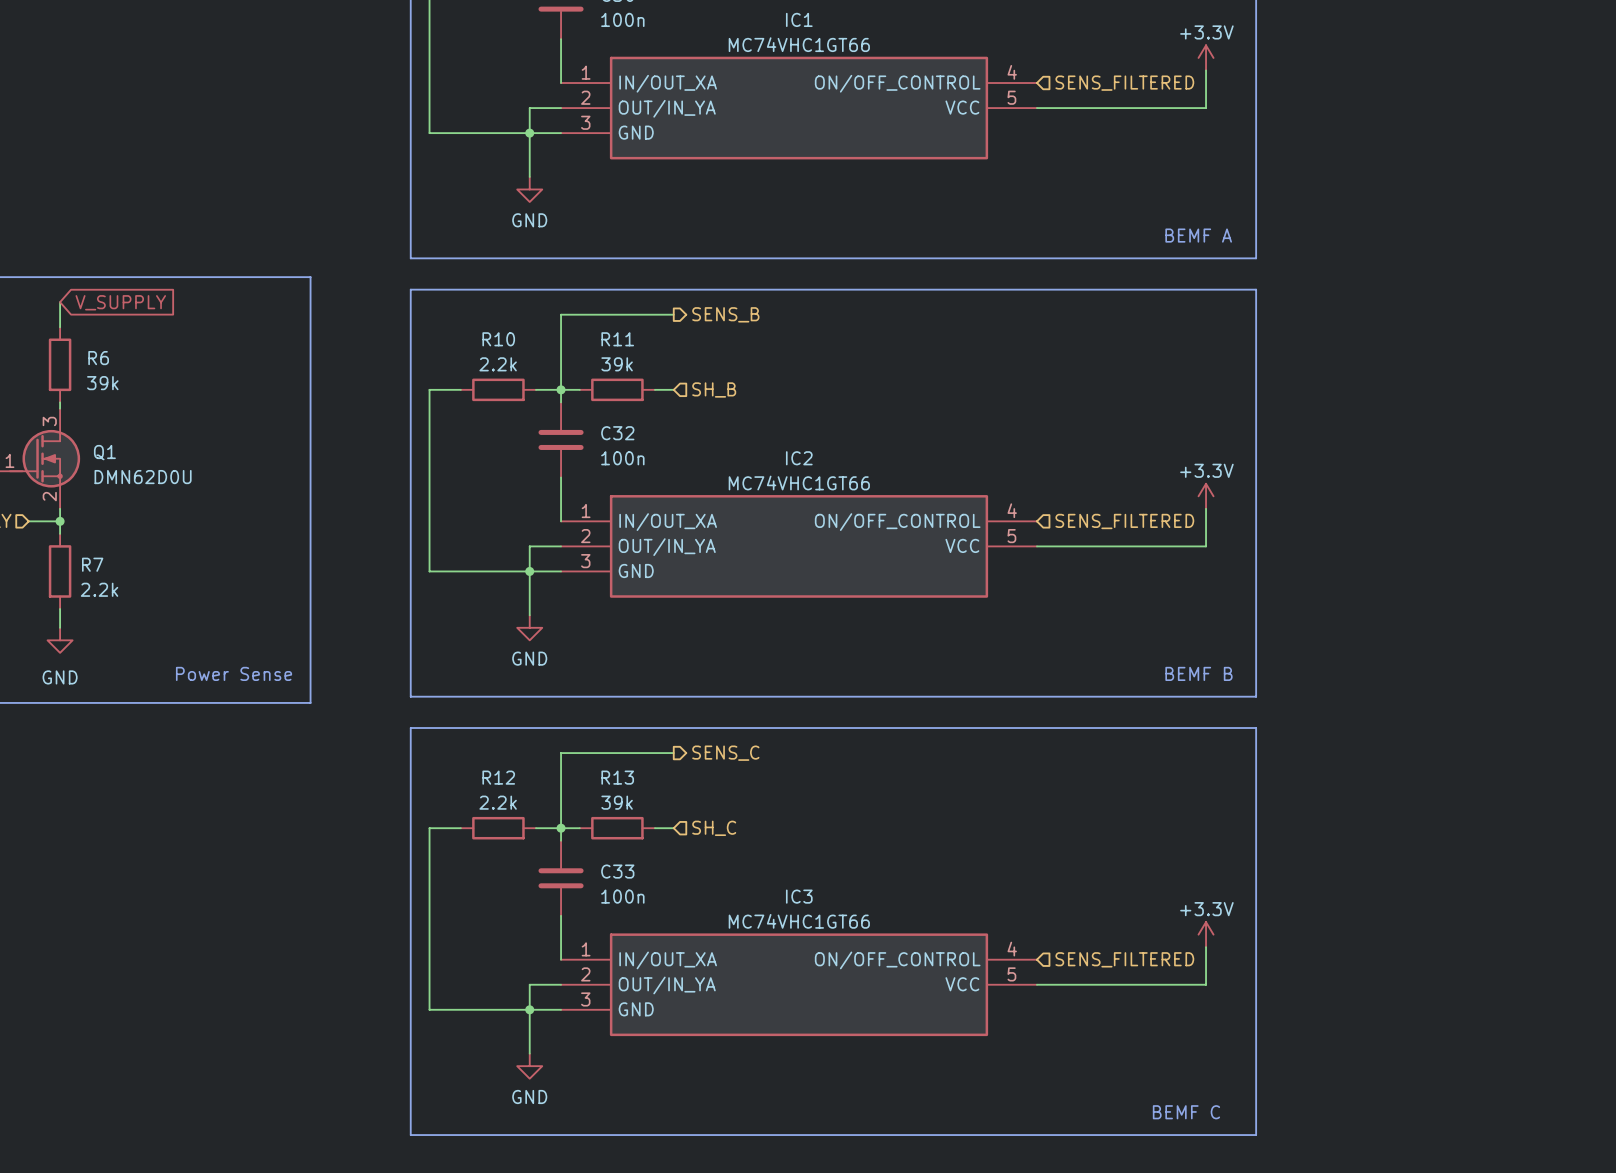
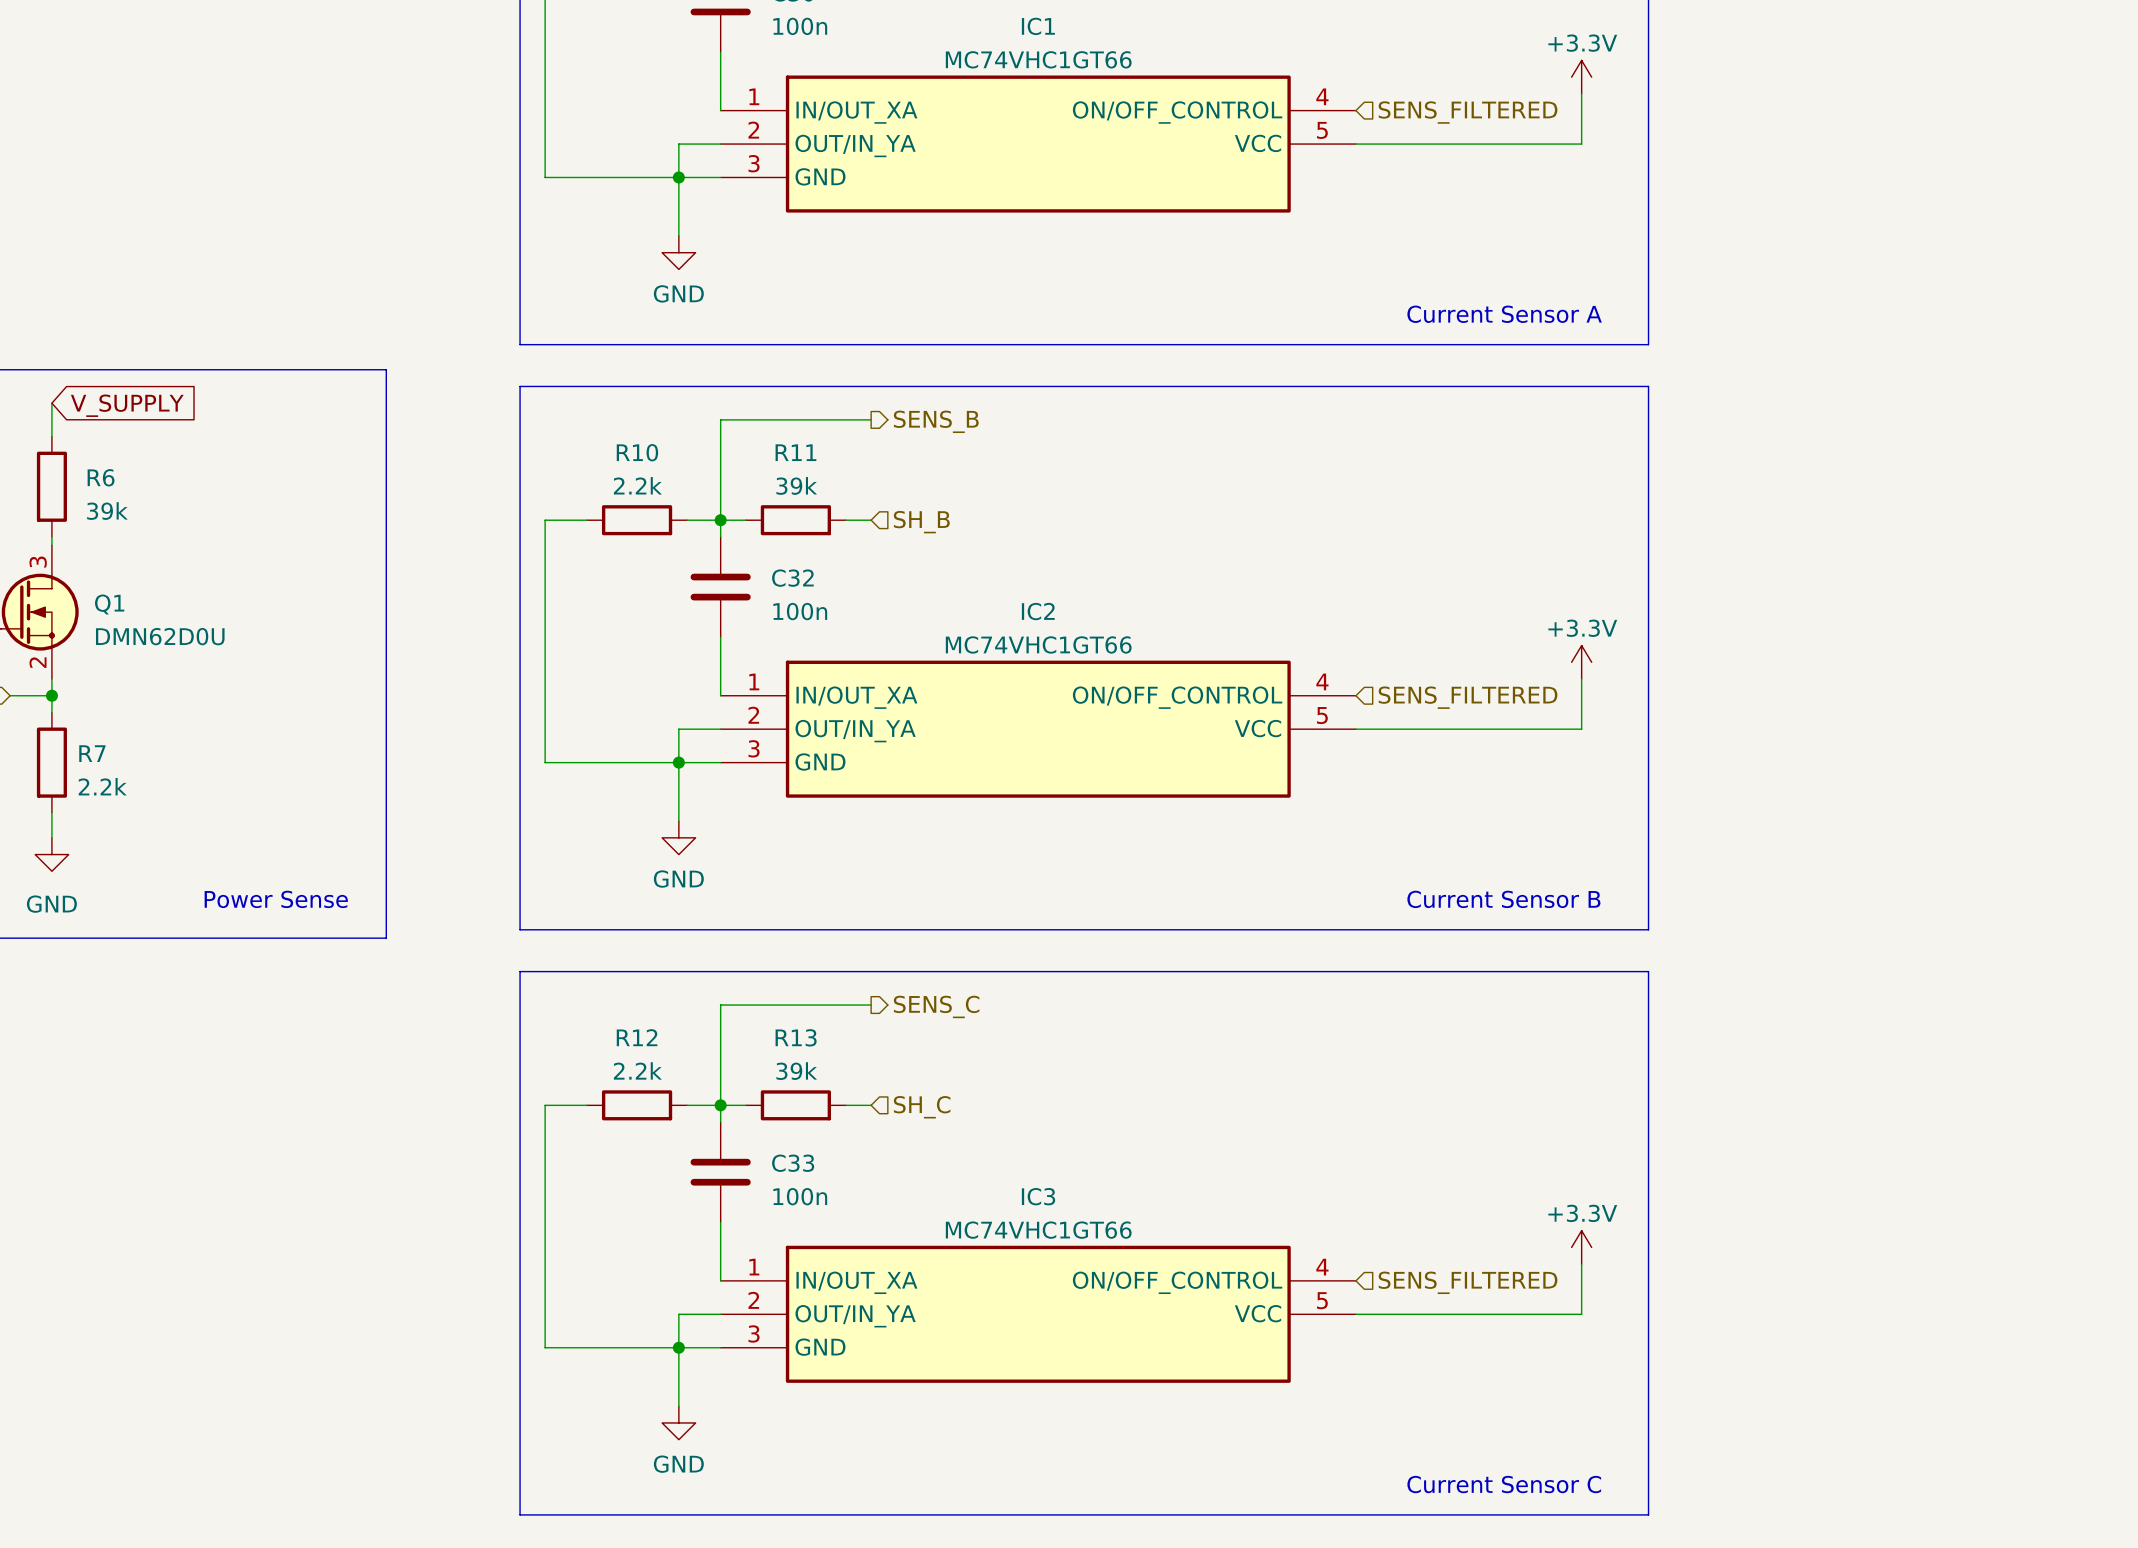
text: none -> Current Sensor A (1504, 314)
text: BEMF A (1198, 235) -> none
text: none -> Current Sensor B (1503, 899)
text: BEMF B (1198, 673) -> none
text: none -> Current Sensor C (1504, 1484)
text: BEMF C (1186, 1112) -> none

